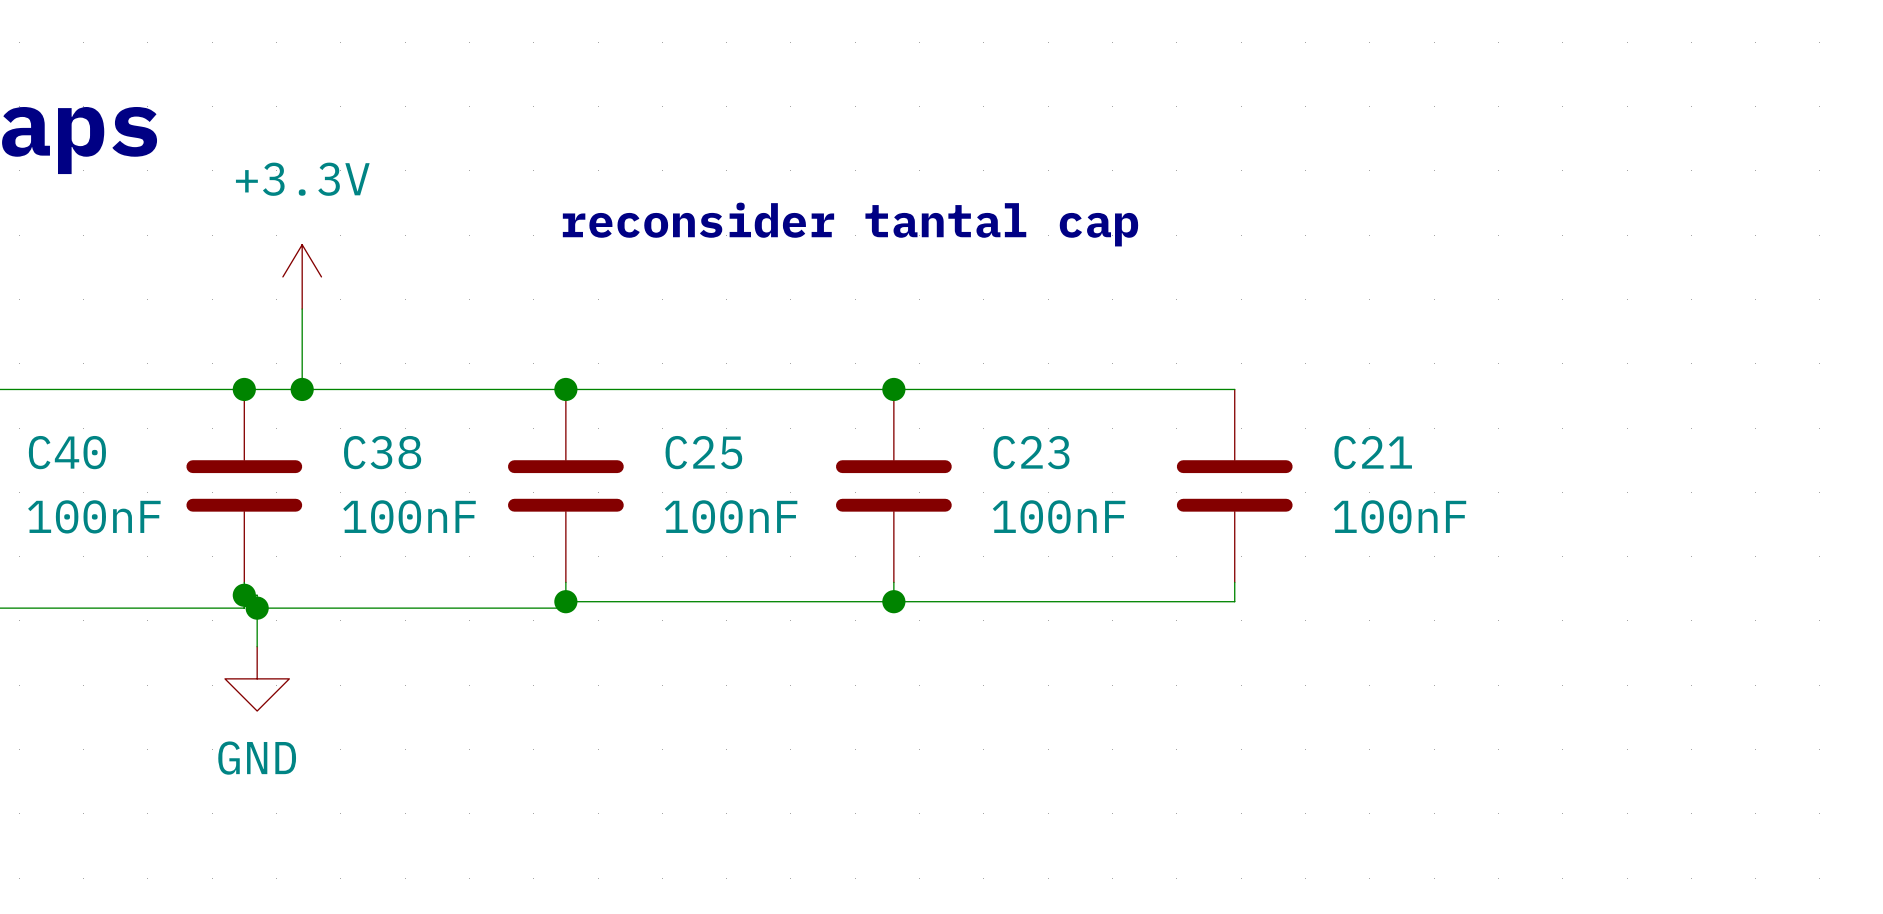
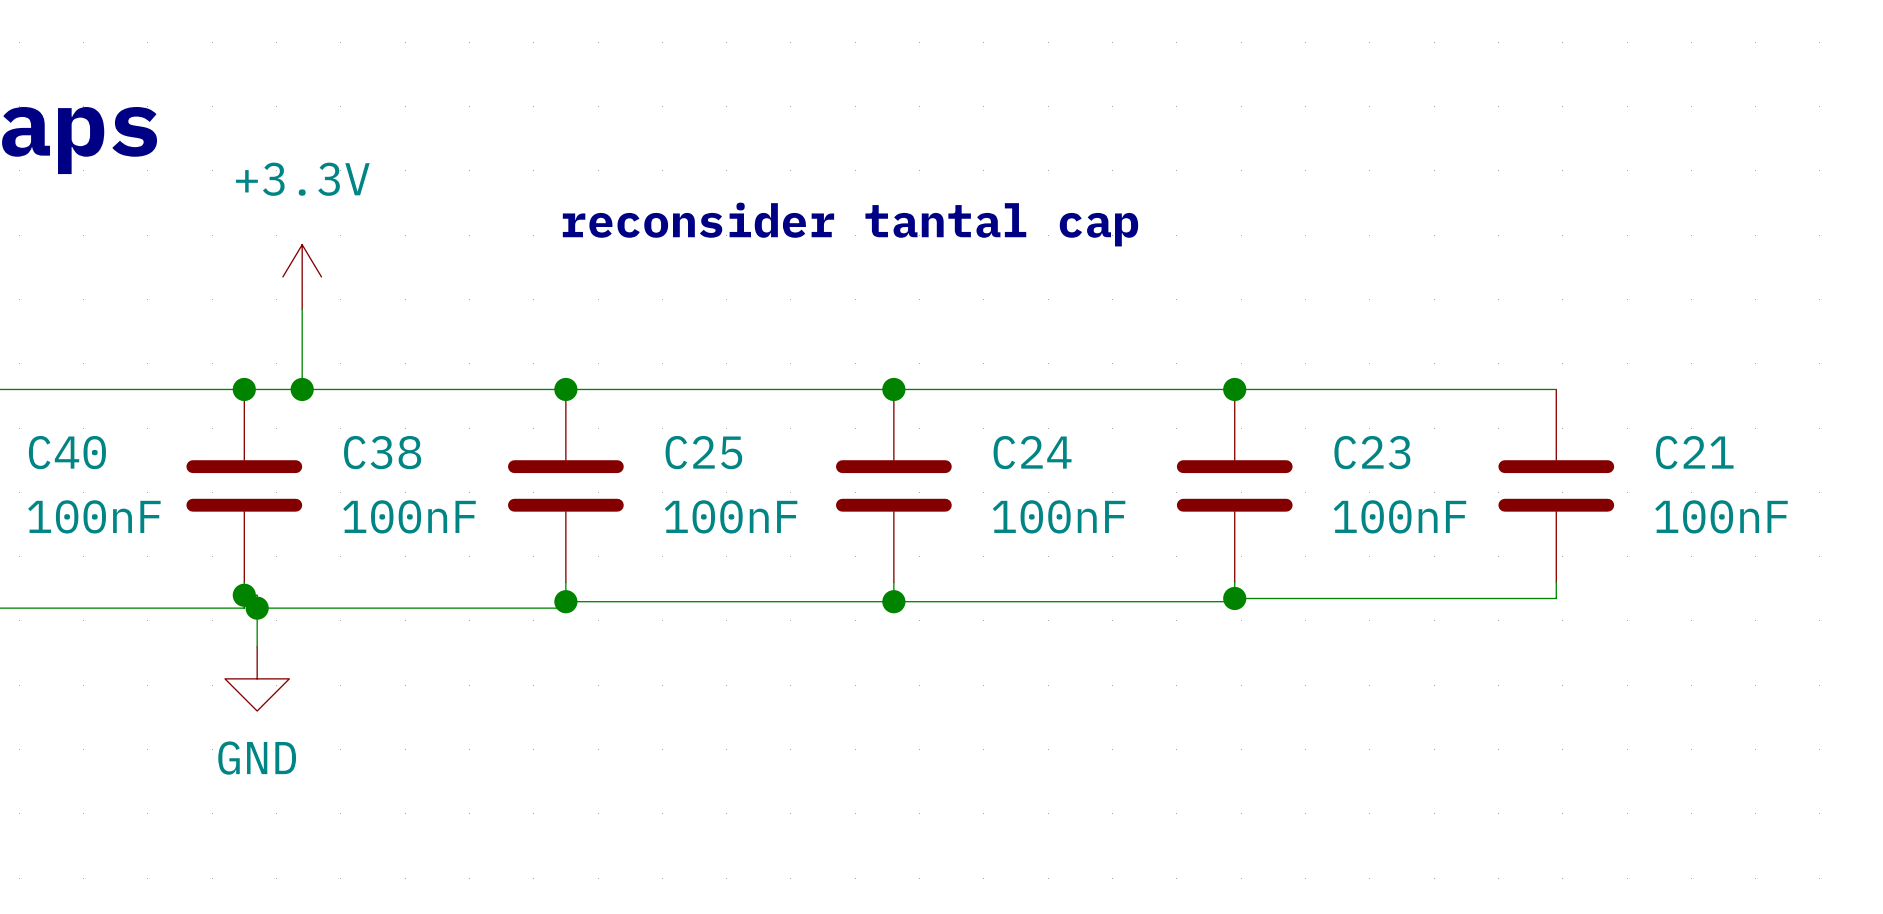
wire: none -> (1234, 389) (1556, 389)
junction: none -> (1234, 389)
C23 name: C23 (1031, 452) -> C24 (1032, 452)
C21 name: C21 (1373, 452) -> C23 (1372, 452)
C21: none -> 100nF (1556, 485)
wire: none -> (1556, 582) (1556, 598) (1234, 598)
junction: none -> (1234, 598)

